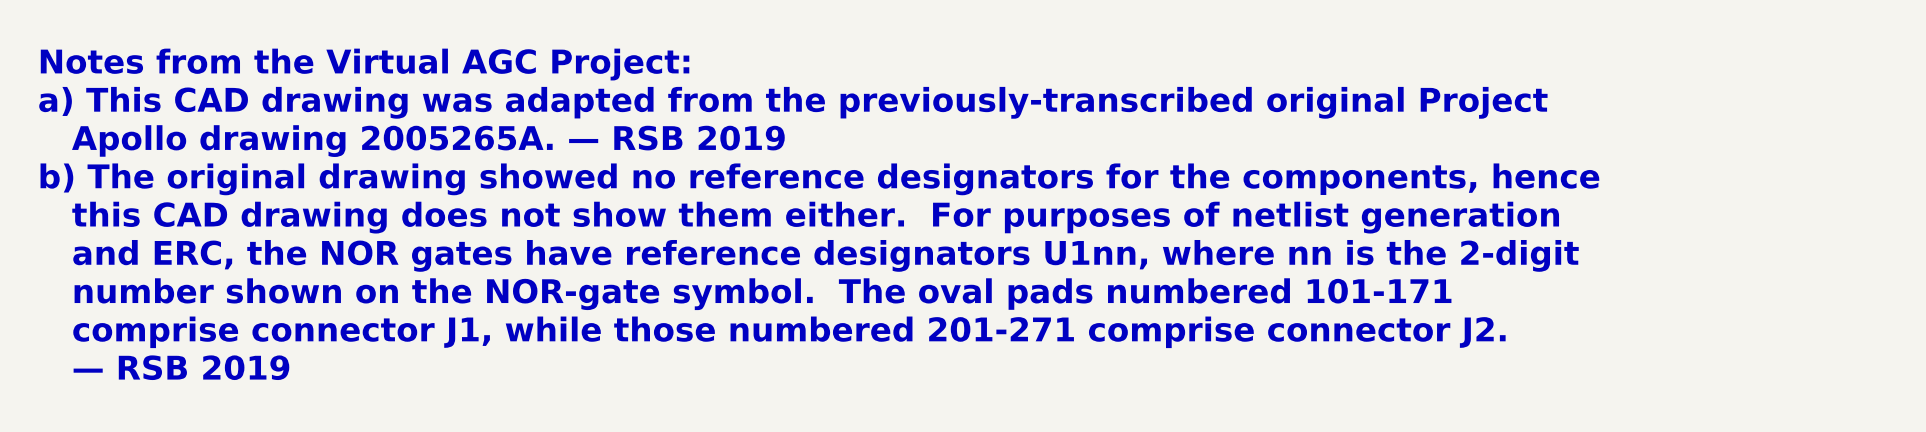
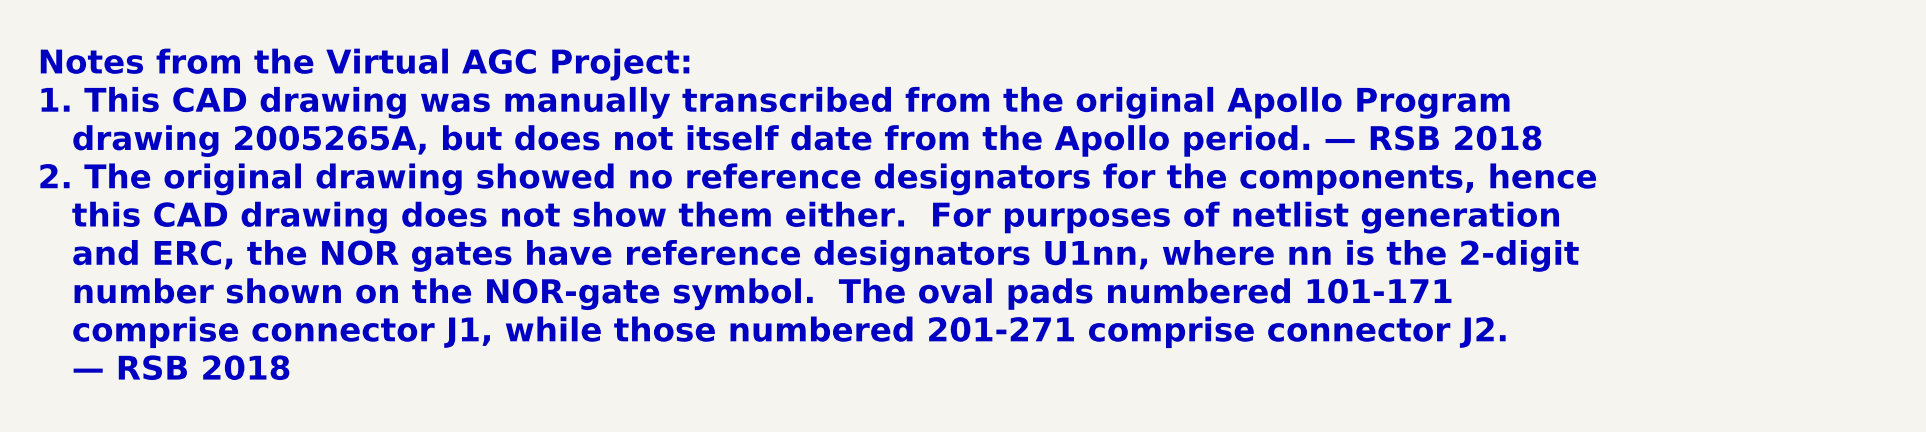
text: a) This CAD drawing was adapted from the previously-transcribed original Project (793, 102) -> 1. This CAD drawing was manually transcribed from the original Apollo Program (775, 102)
text: Apollo drawing 2005265A. — RSB 2019 (428, 141) -> drawing 2005265A, but does not itself date from the Apollo period. — RSB 2018 (807, 141)
text: b) The original drawing showed no reference designators for the components, hence (819, 179) -> 2. The original drawing showed no reference designators for the components, hence (818, 179)
text: — RSB 2019 (181, 367) -> — RSB 2018 (181, 367)

